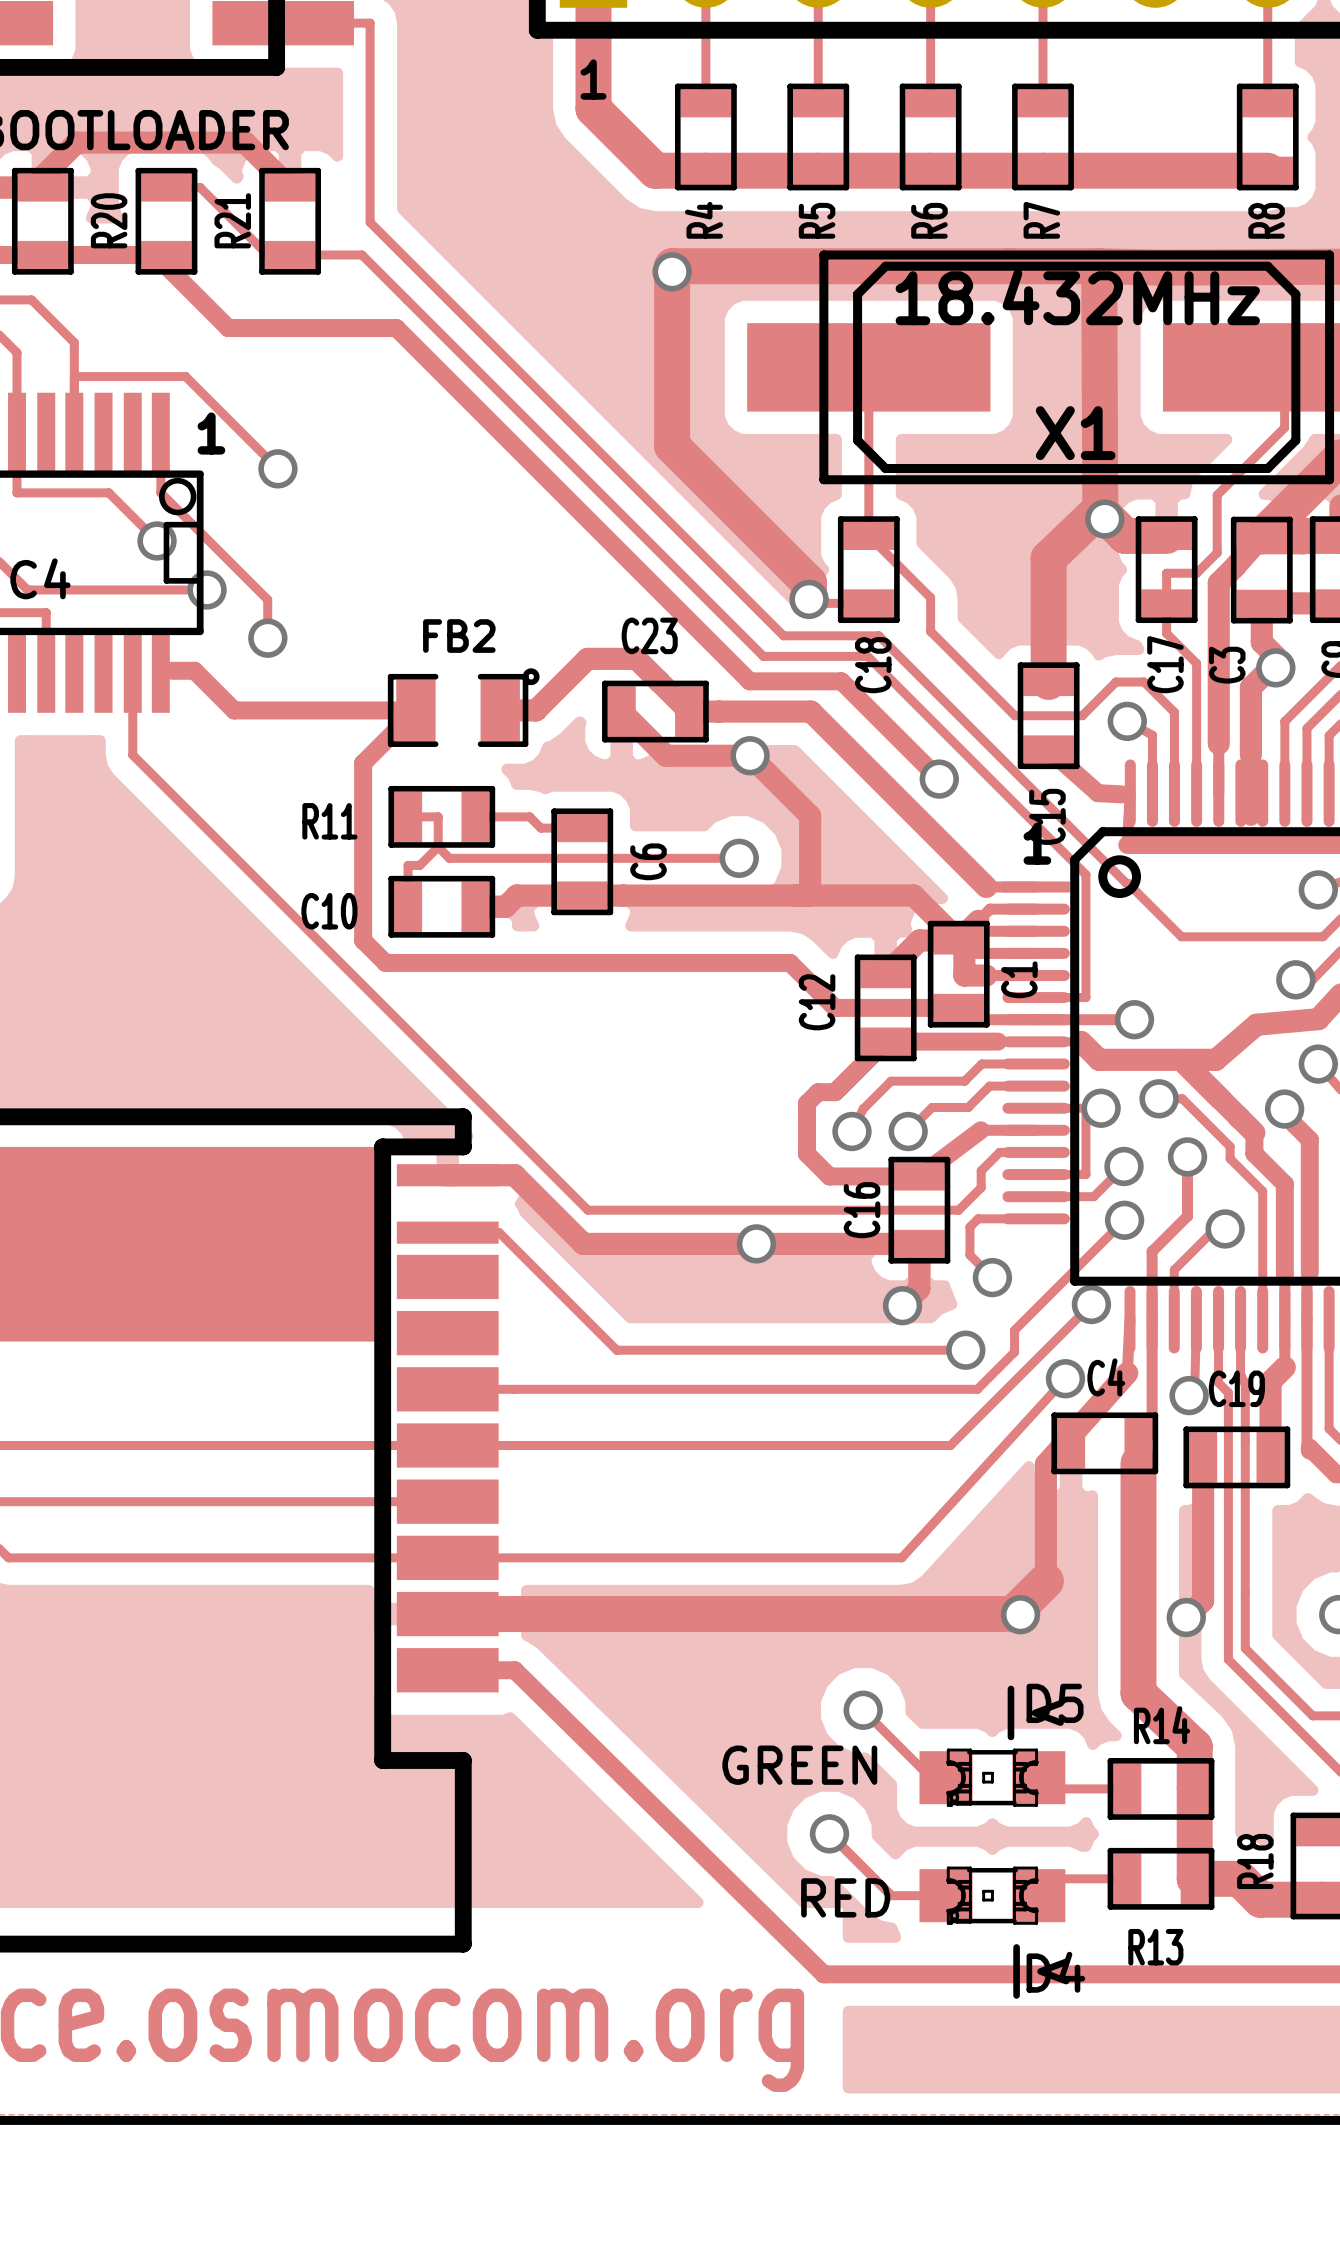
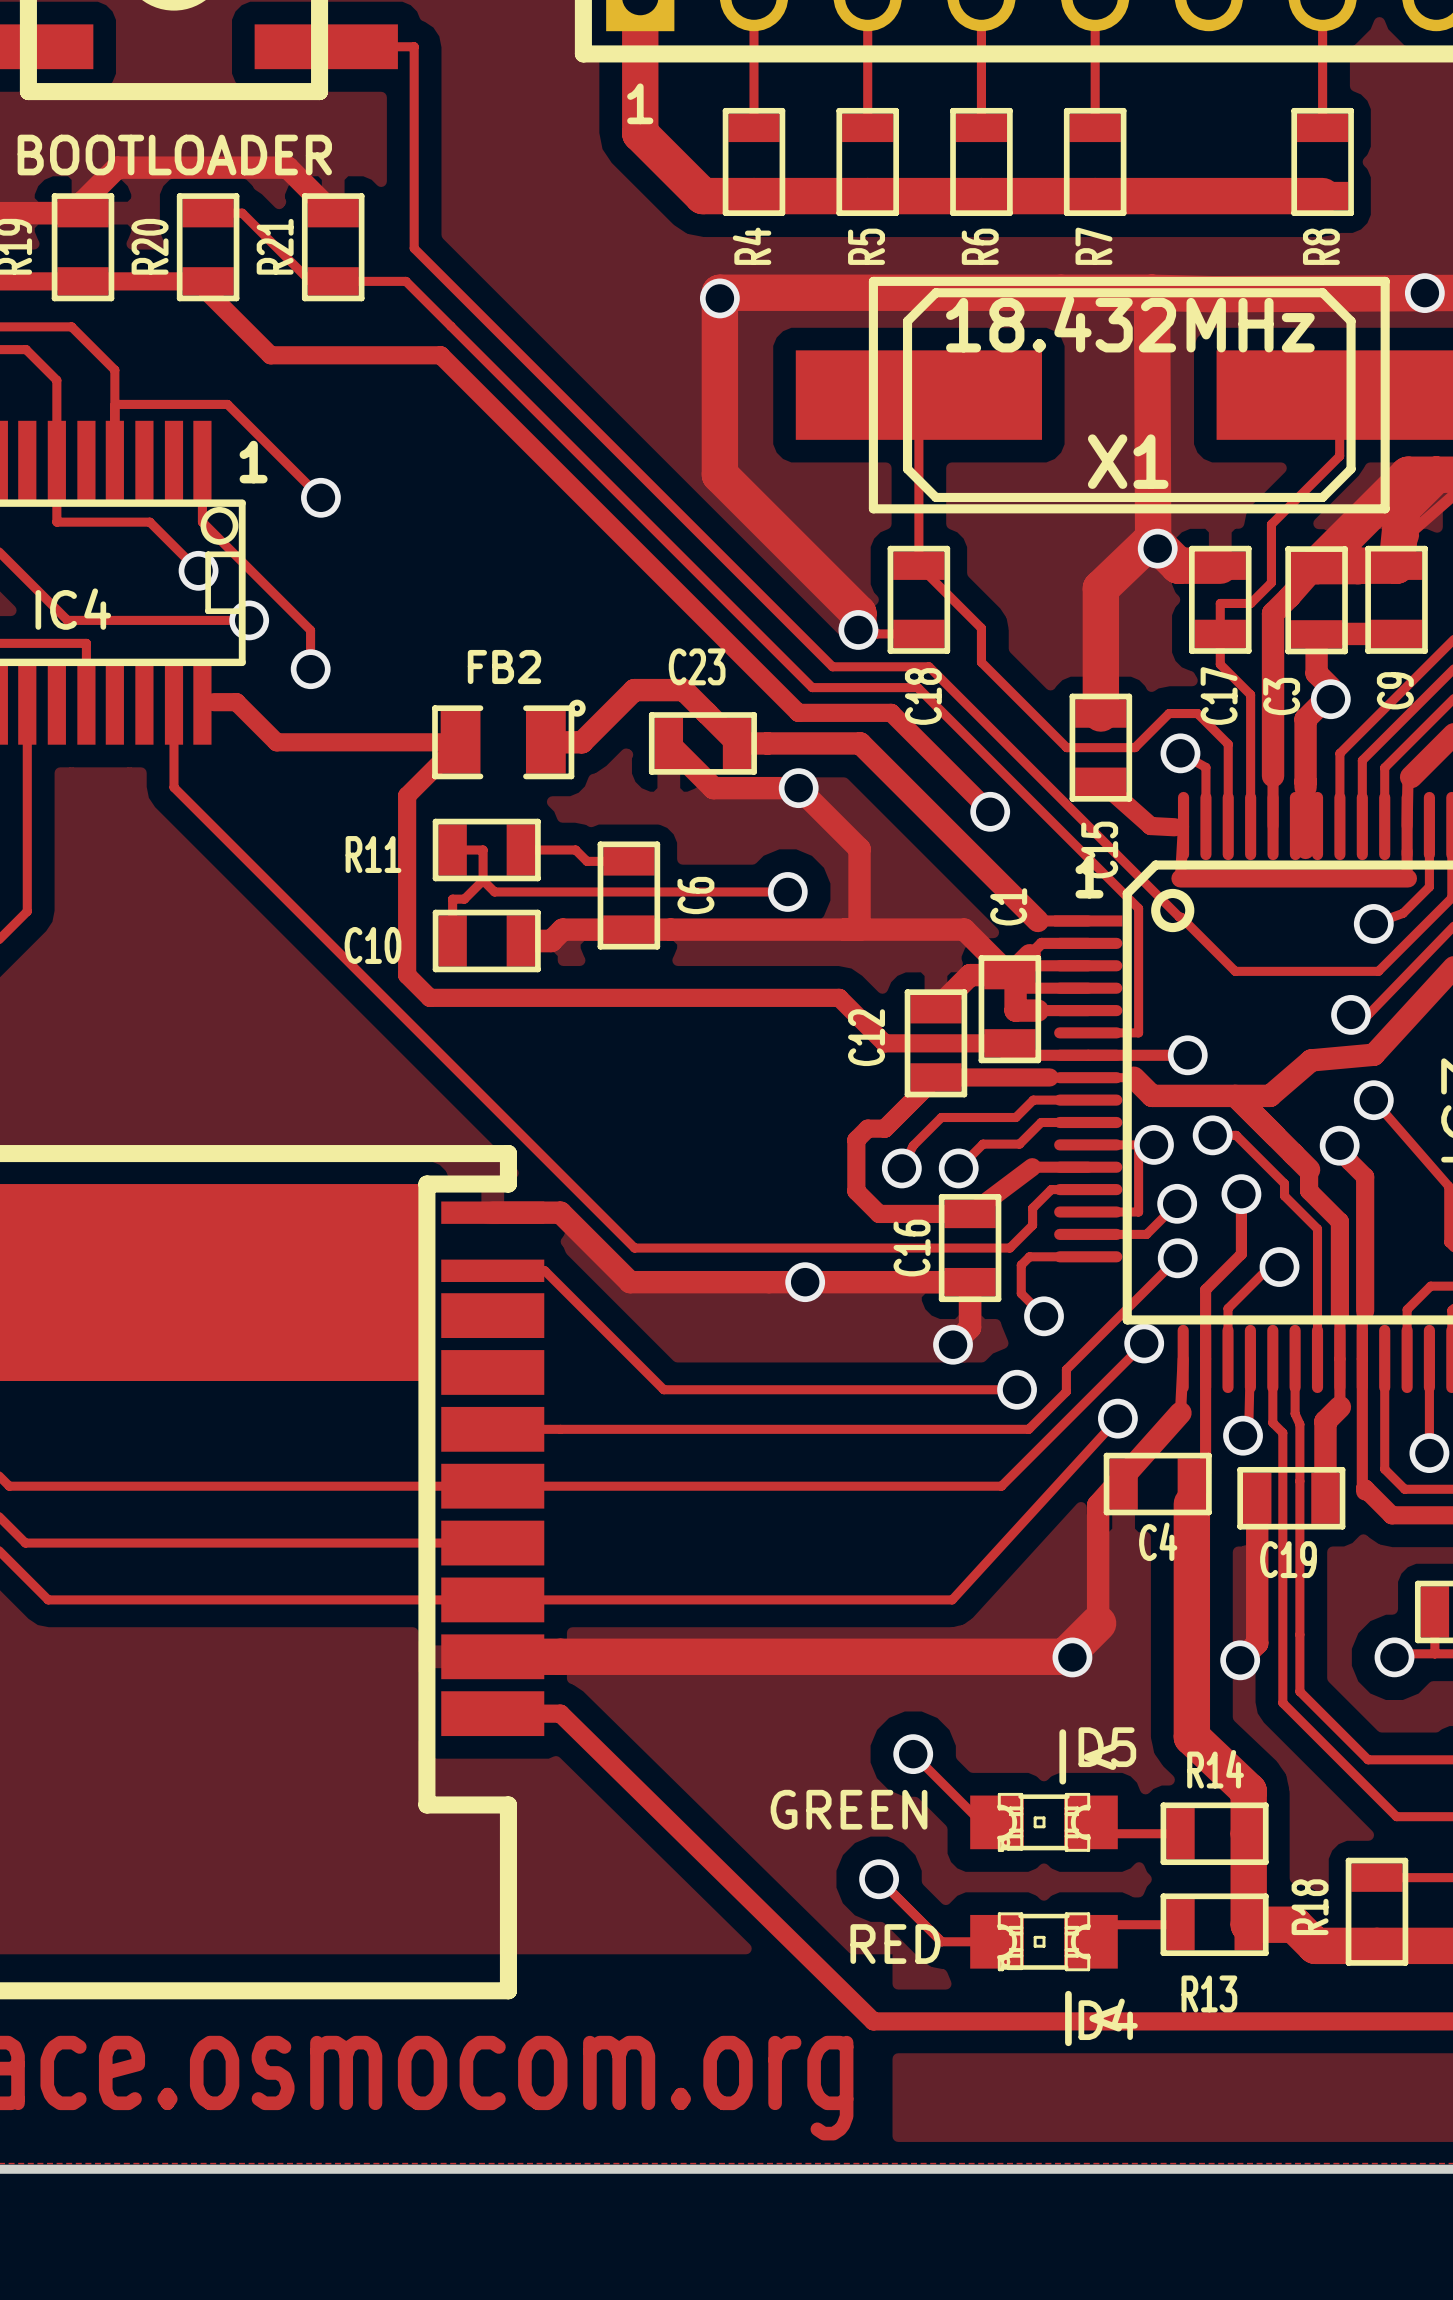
C1 name position: C1 (1019, 979) -> C1 (1008, 906)
C4 name position: C4 (1106, 1377) -> C4 (1158, 1541)
C19 name position: C19 (1236, 1388) -> C19 (1288, 1559)

